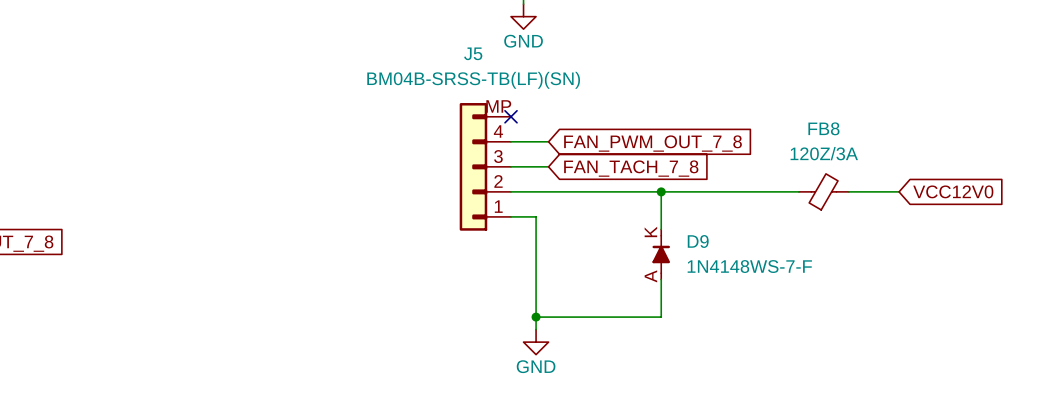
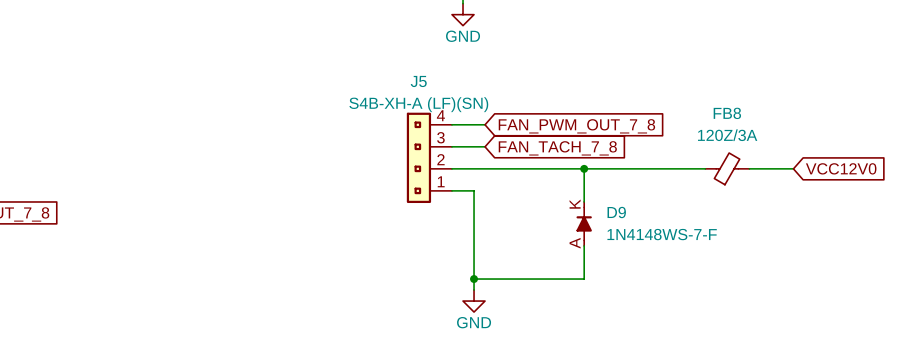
J5 name position: J5 (473, 53) -> J5 (418, 81)
J5 text: BM04B-SRSS-TB(LF)(SN) (473, 80) -> S4B-XH-A (LF)(SN) (418, 104)
J5 symbol: [459, 103, 512, 231] -> [406, 112, 452, 204]
no-connect mark: (511, 116) -> none

